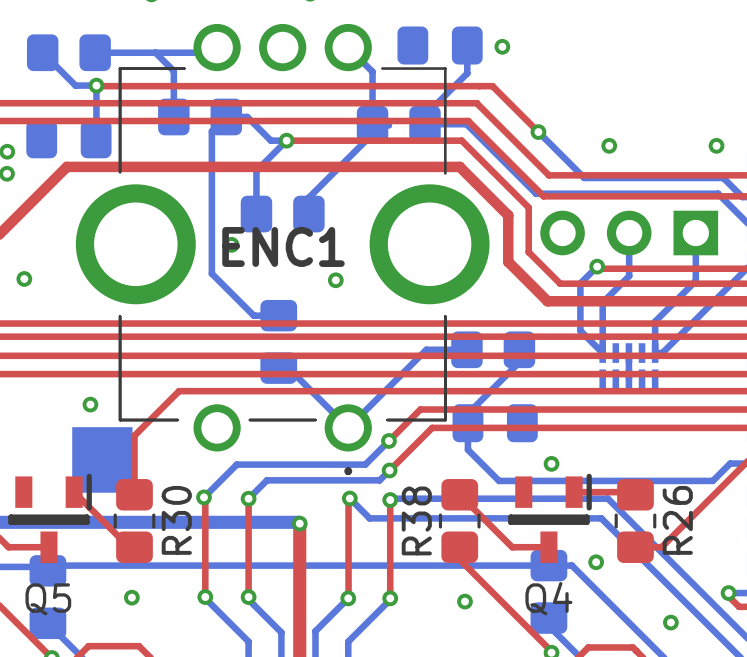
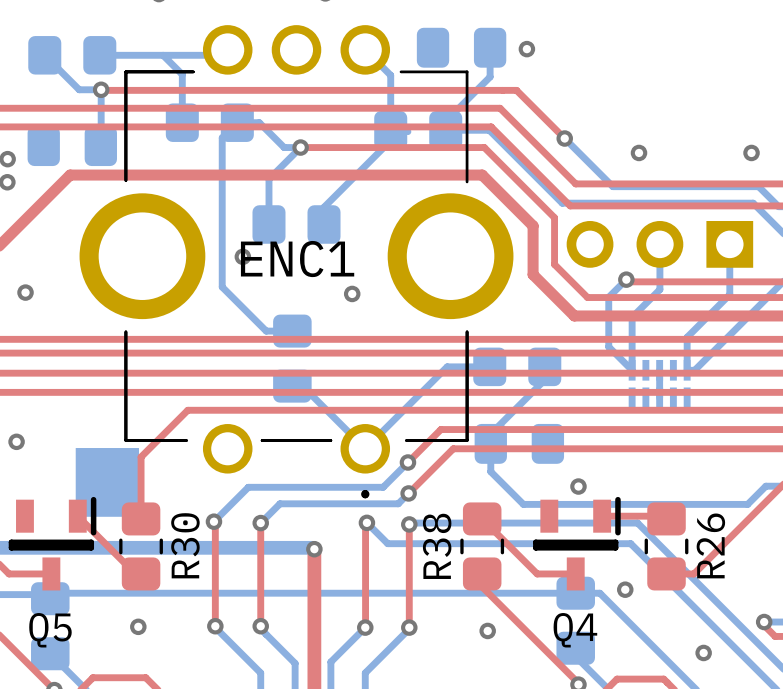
via position: (90, 404) -> (16, 441)

